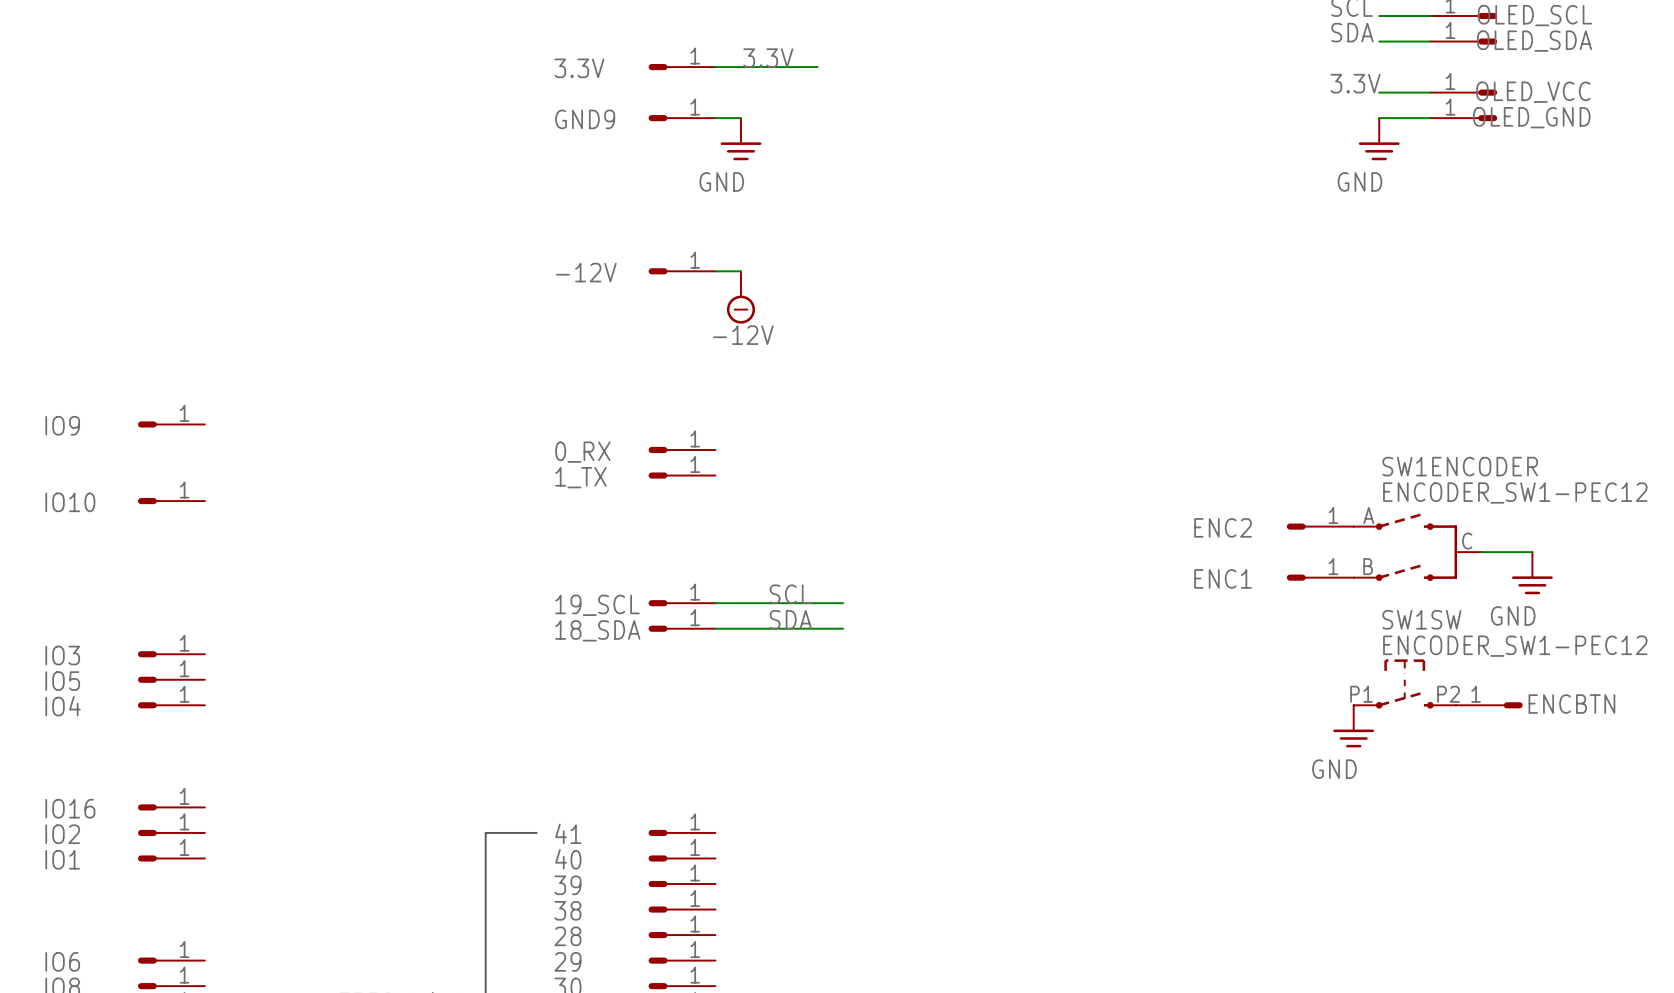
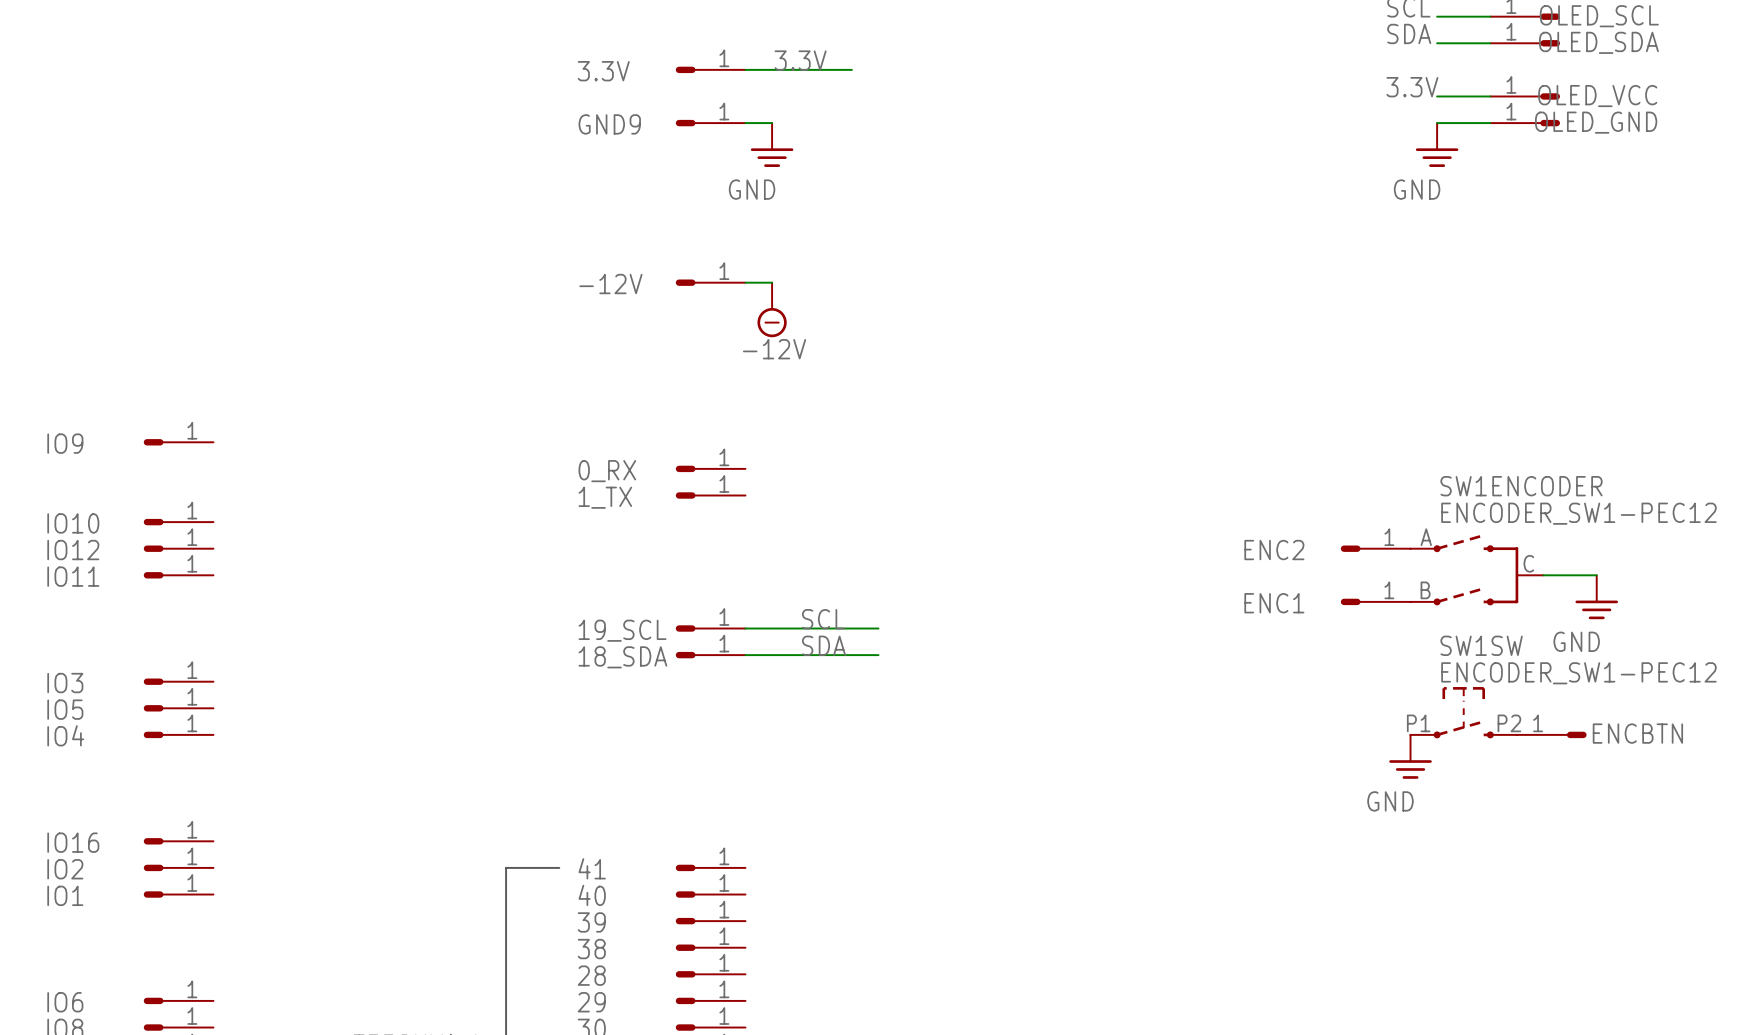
IO12: none -> (178, 548)
IO11: none -> (178, 575)

